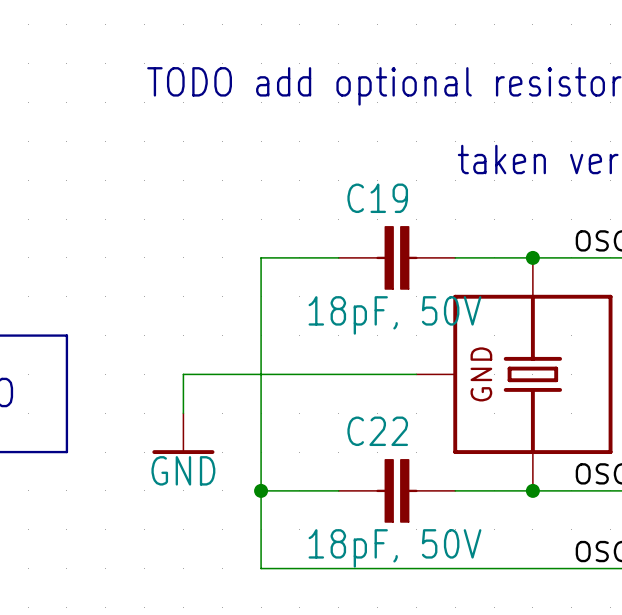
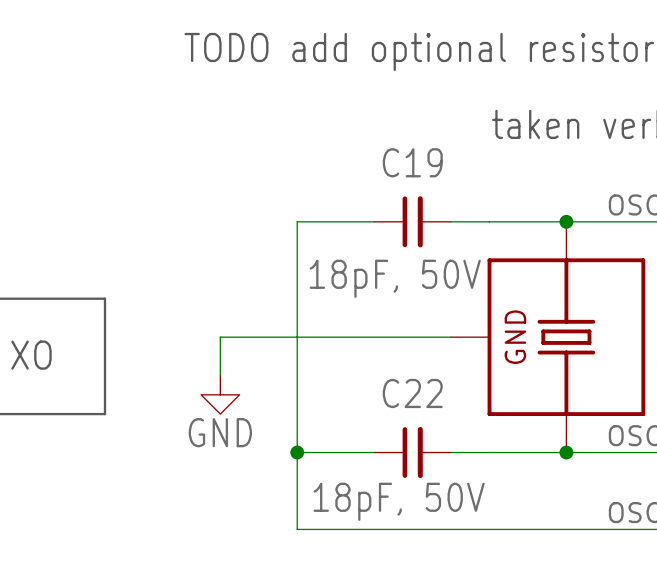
C19 symbol: [338, 226, 456, 289] -> [374, 196, 452, 248]
power symbol shape: [152, 413, 215, 455] -> [201, 375, 240, 415]
C22 symbol: [338, 459, 456, 522] -> [374, 426, 452, 479]

